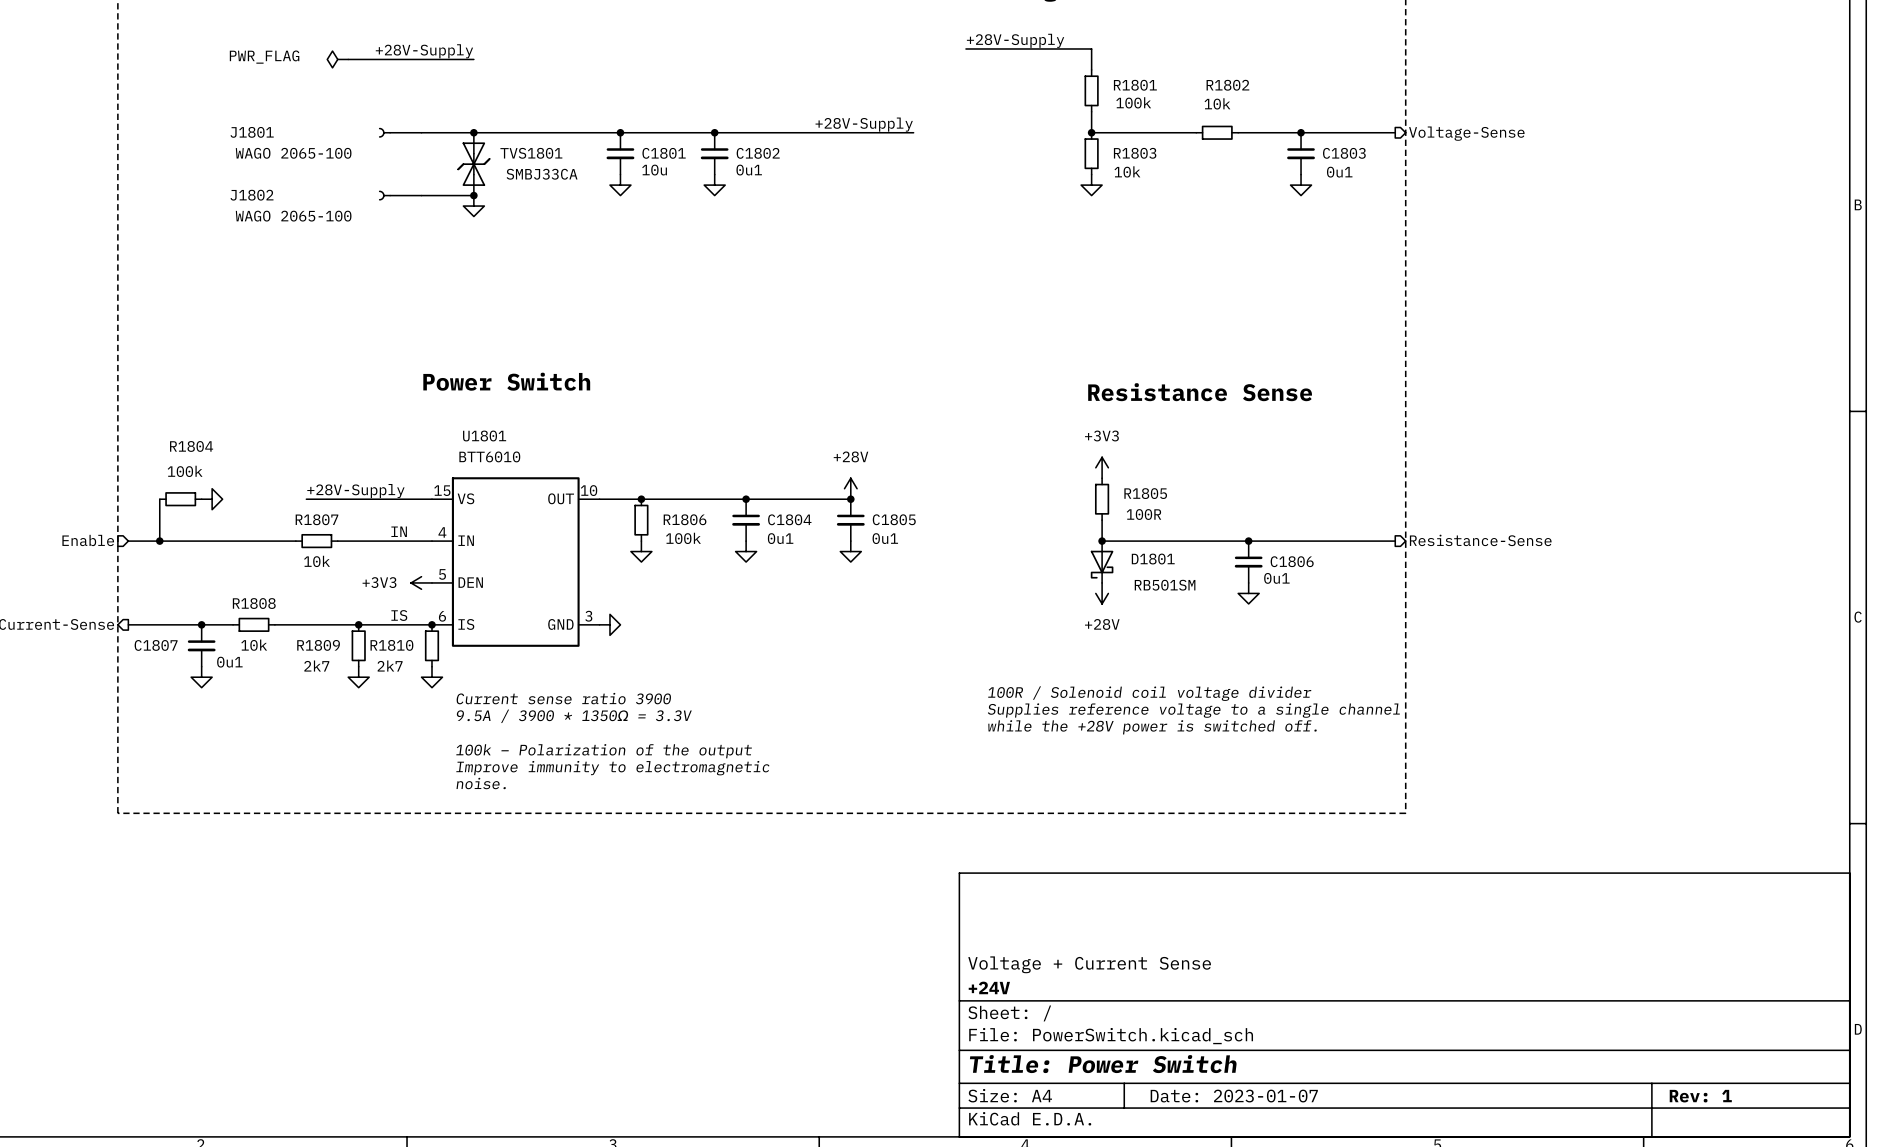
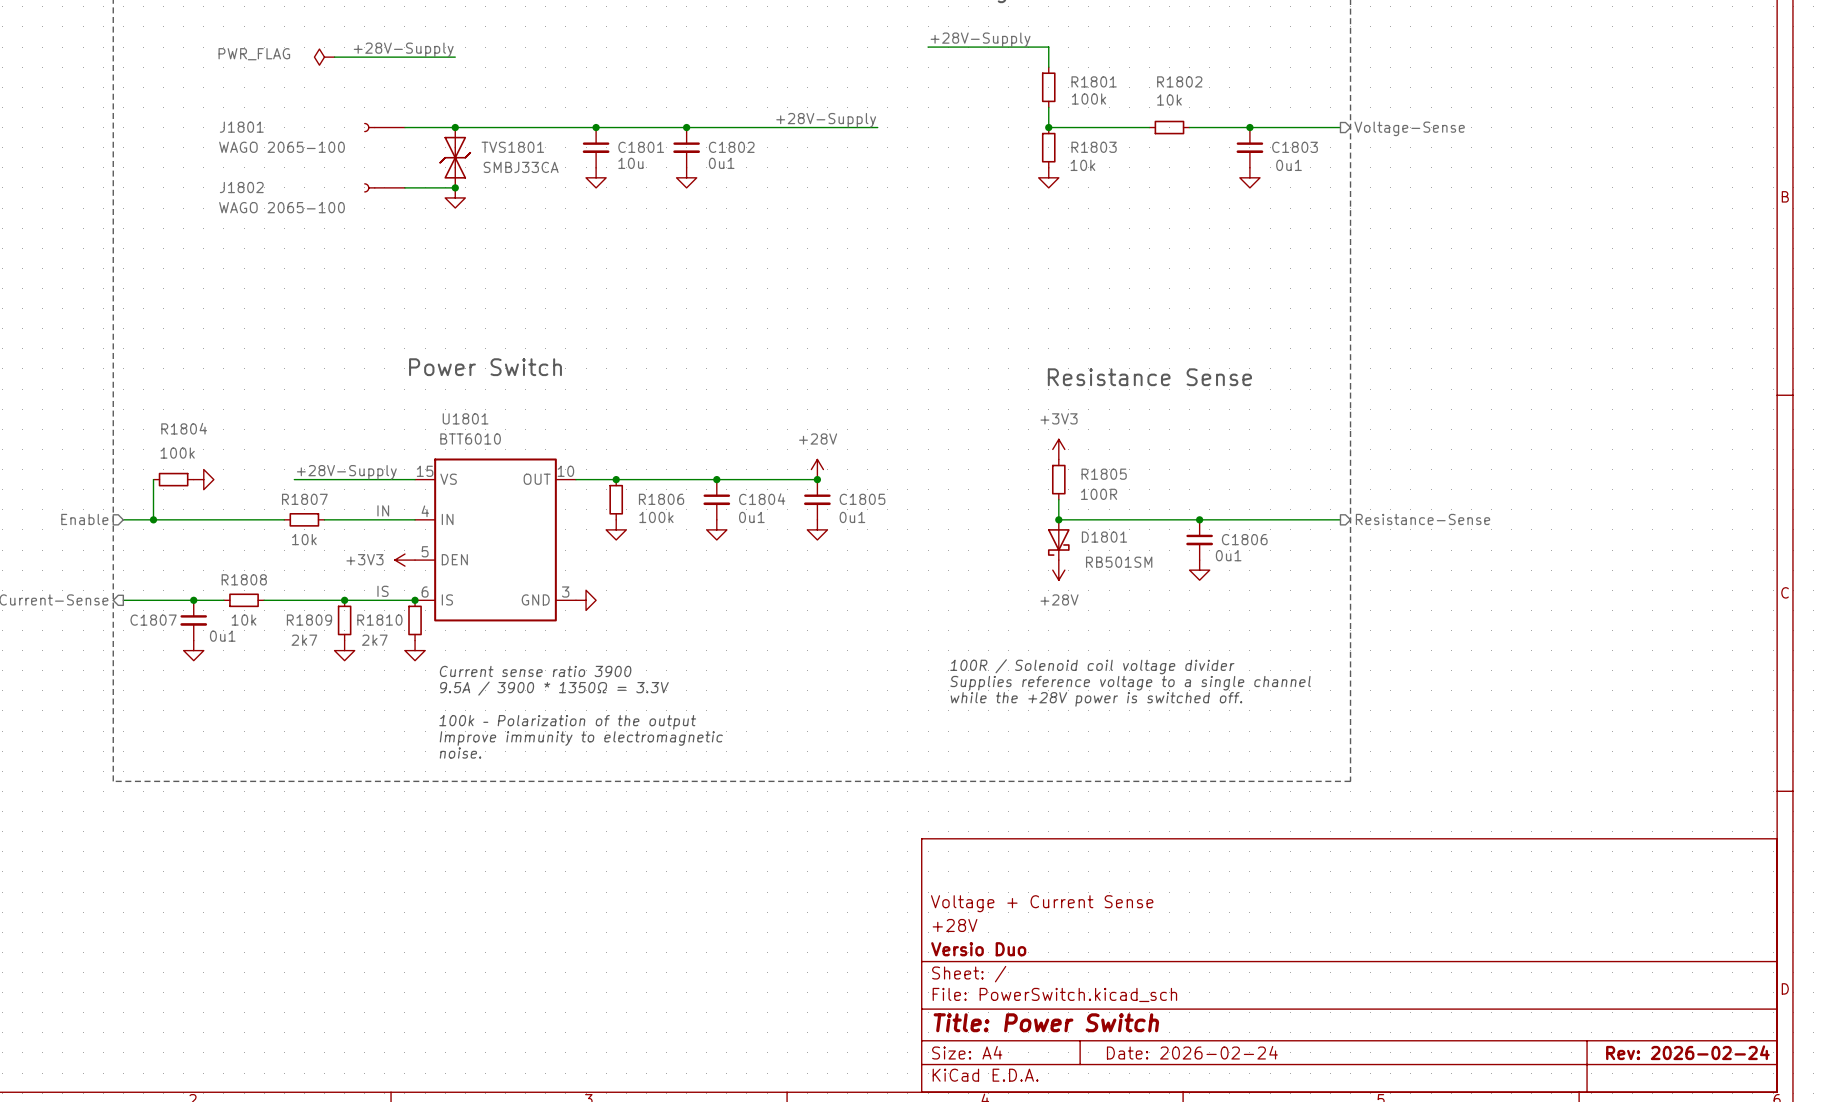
title block: none -> Voltage + Current Sense (1042, 903)
title block: Voltage + Current Sense (1089, 964) -> +28V (955, 925)
title block: +24V (989, 987) -> Versio Duo (978, 949)
title block: Date: 2023-01-07 (1234, 1096) -> Date: 2026-02-24 (1192, 1052)
title block: Rev: 1 (1700, 1096) -> Rev: 2026-02-24 (1687, 1052)

